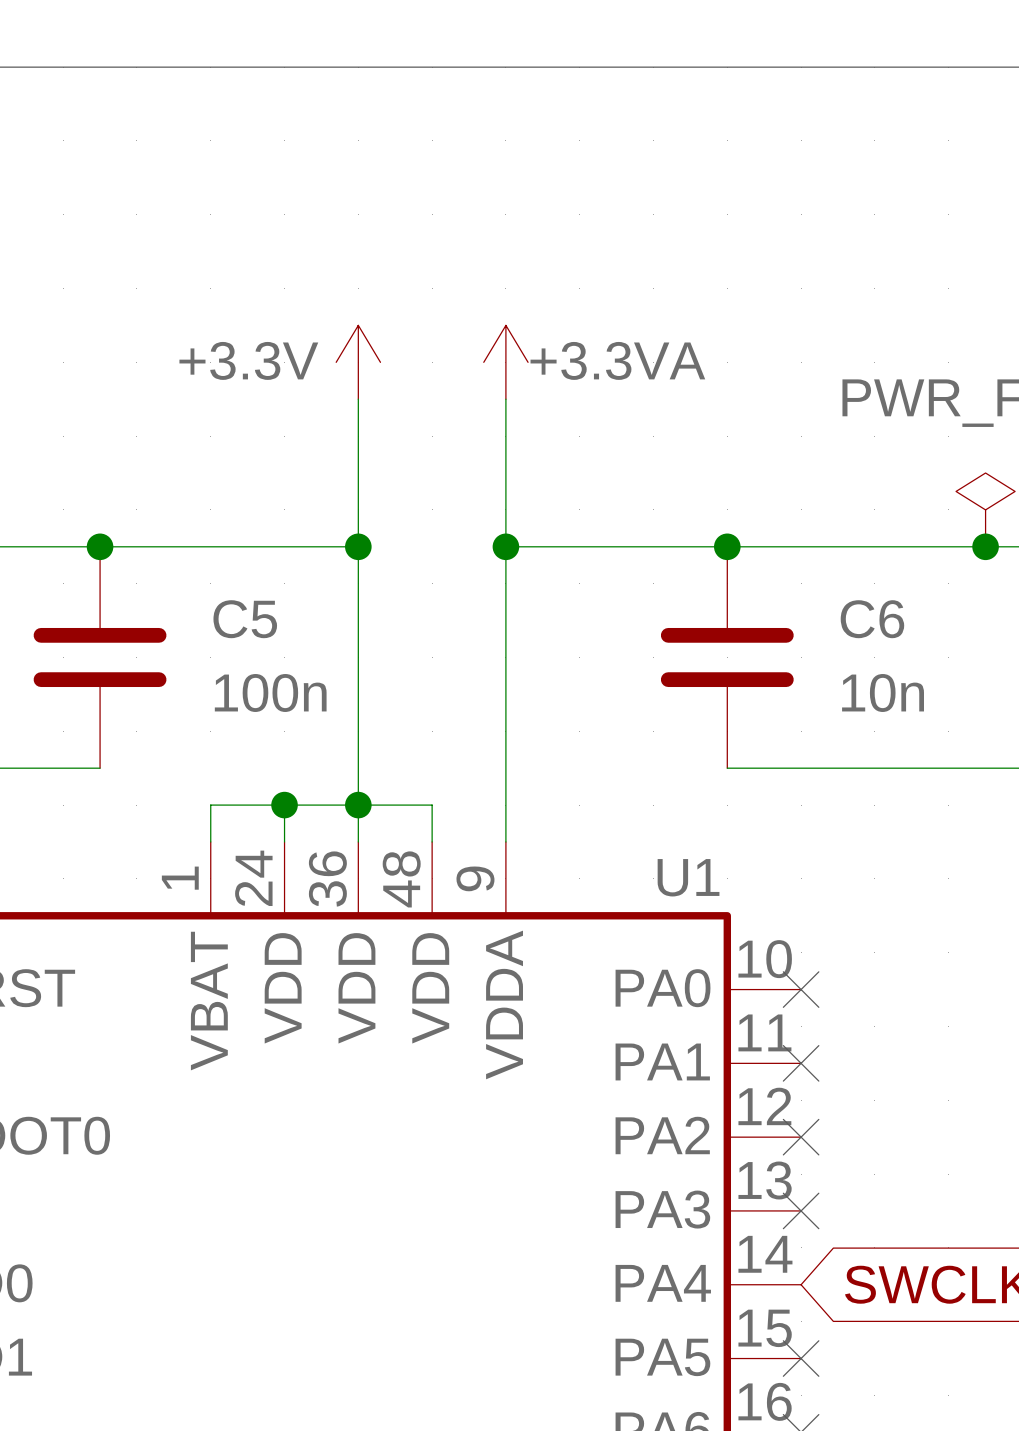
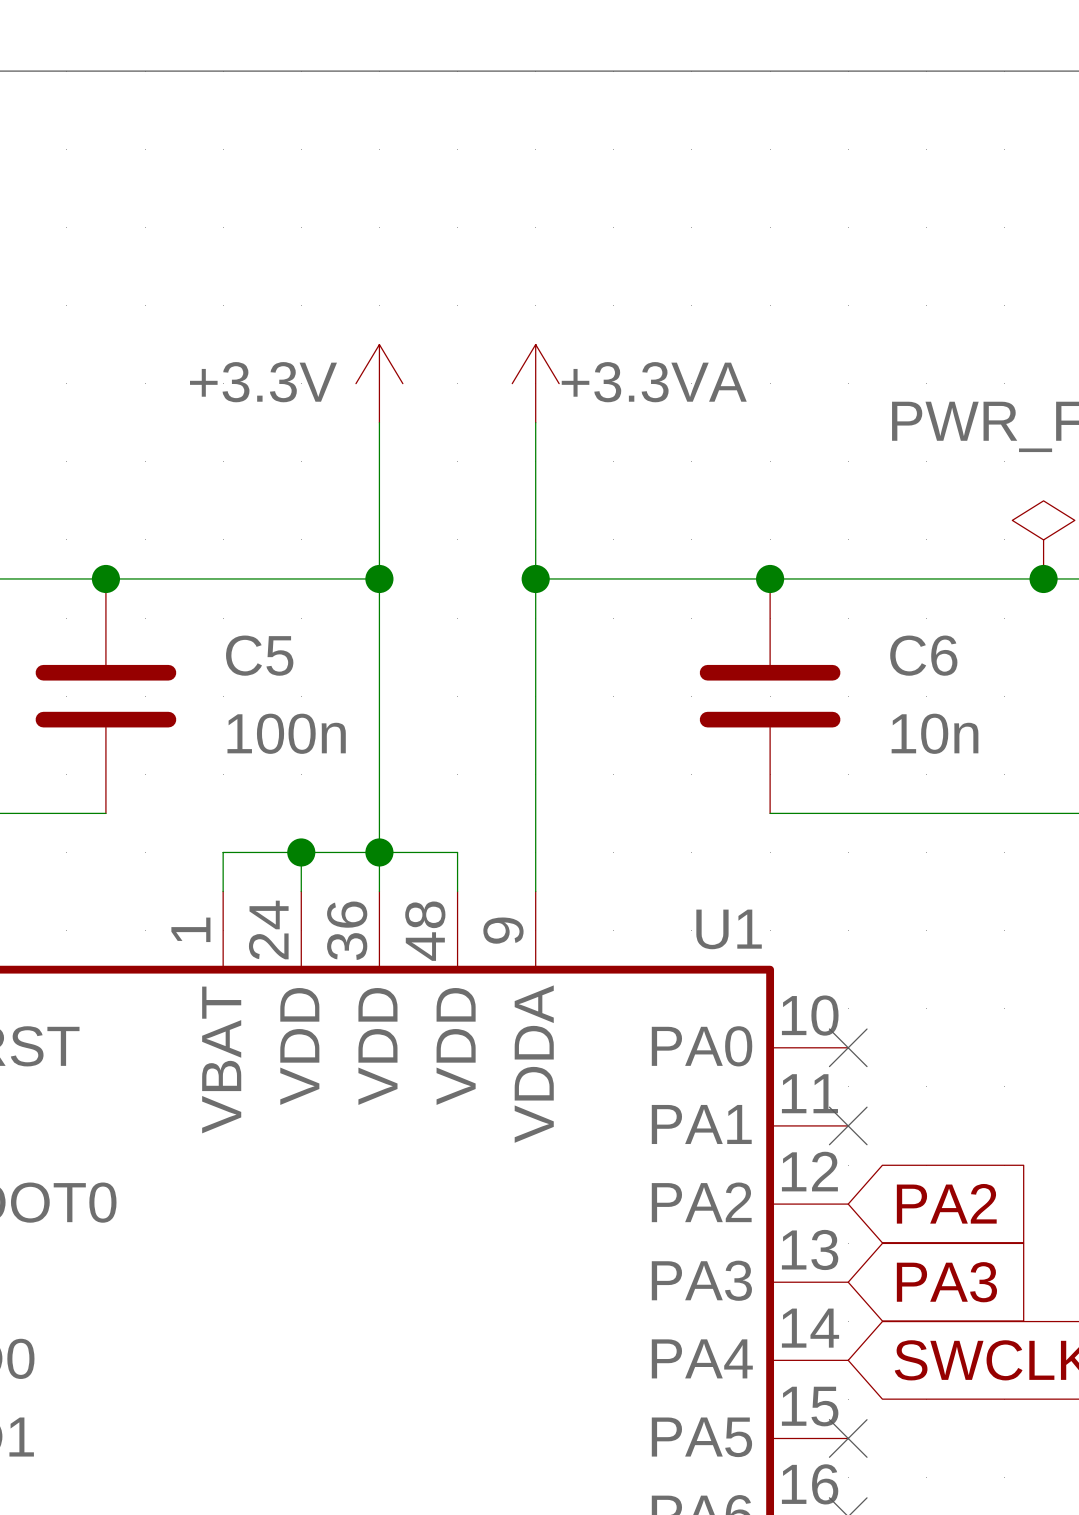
global label: none -> PA2 (946, 1203)
no-connect mark: (801, 1137) -> none
no-connect mark: (801, 1210) -> none
global label: none -> PA3 (946, 1282)

